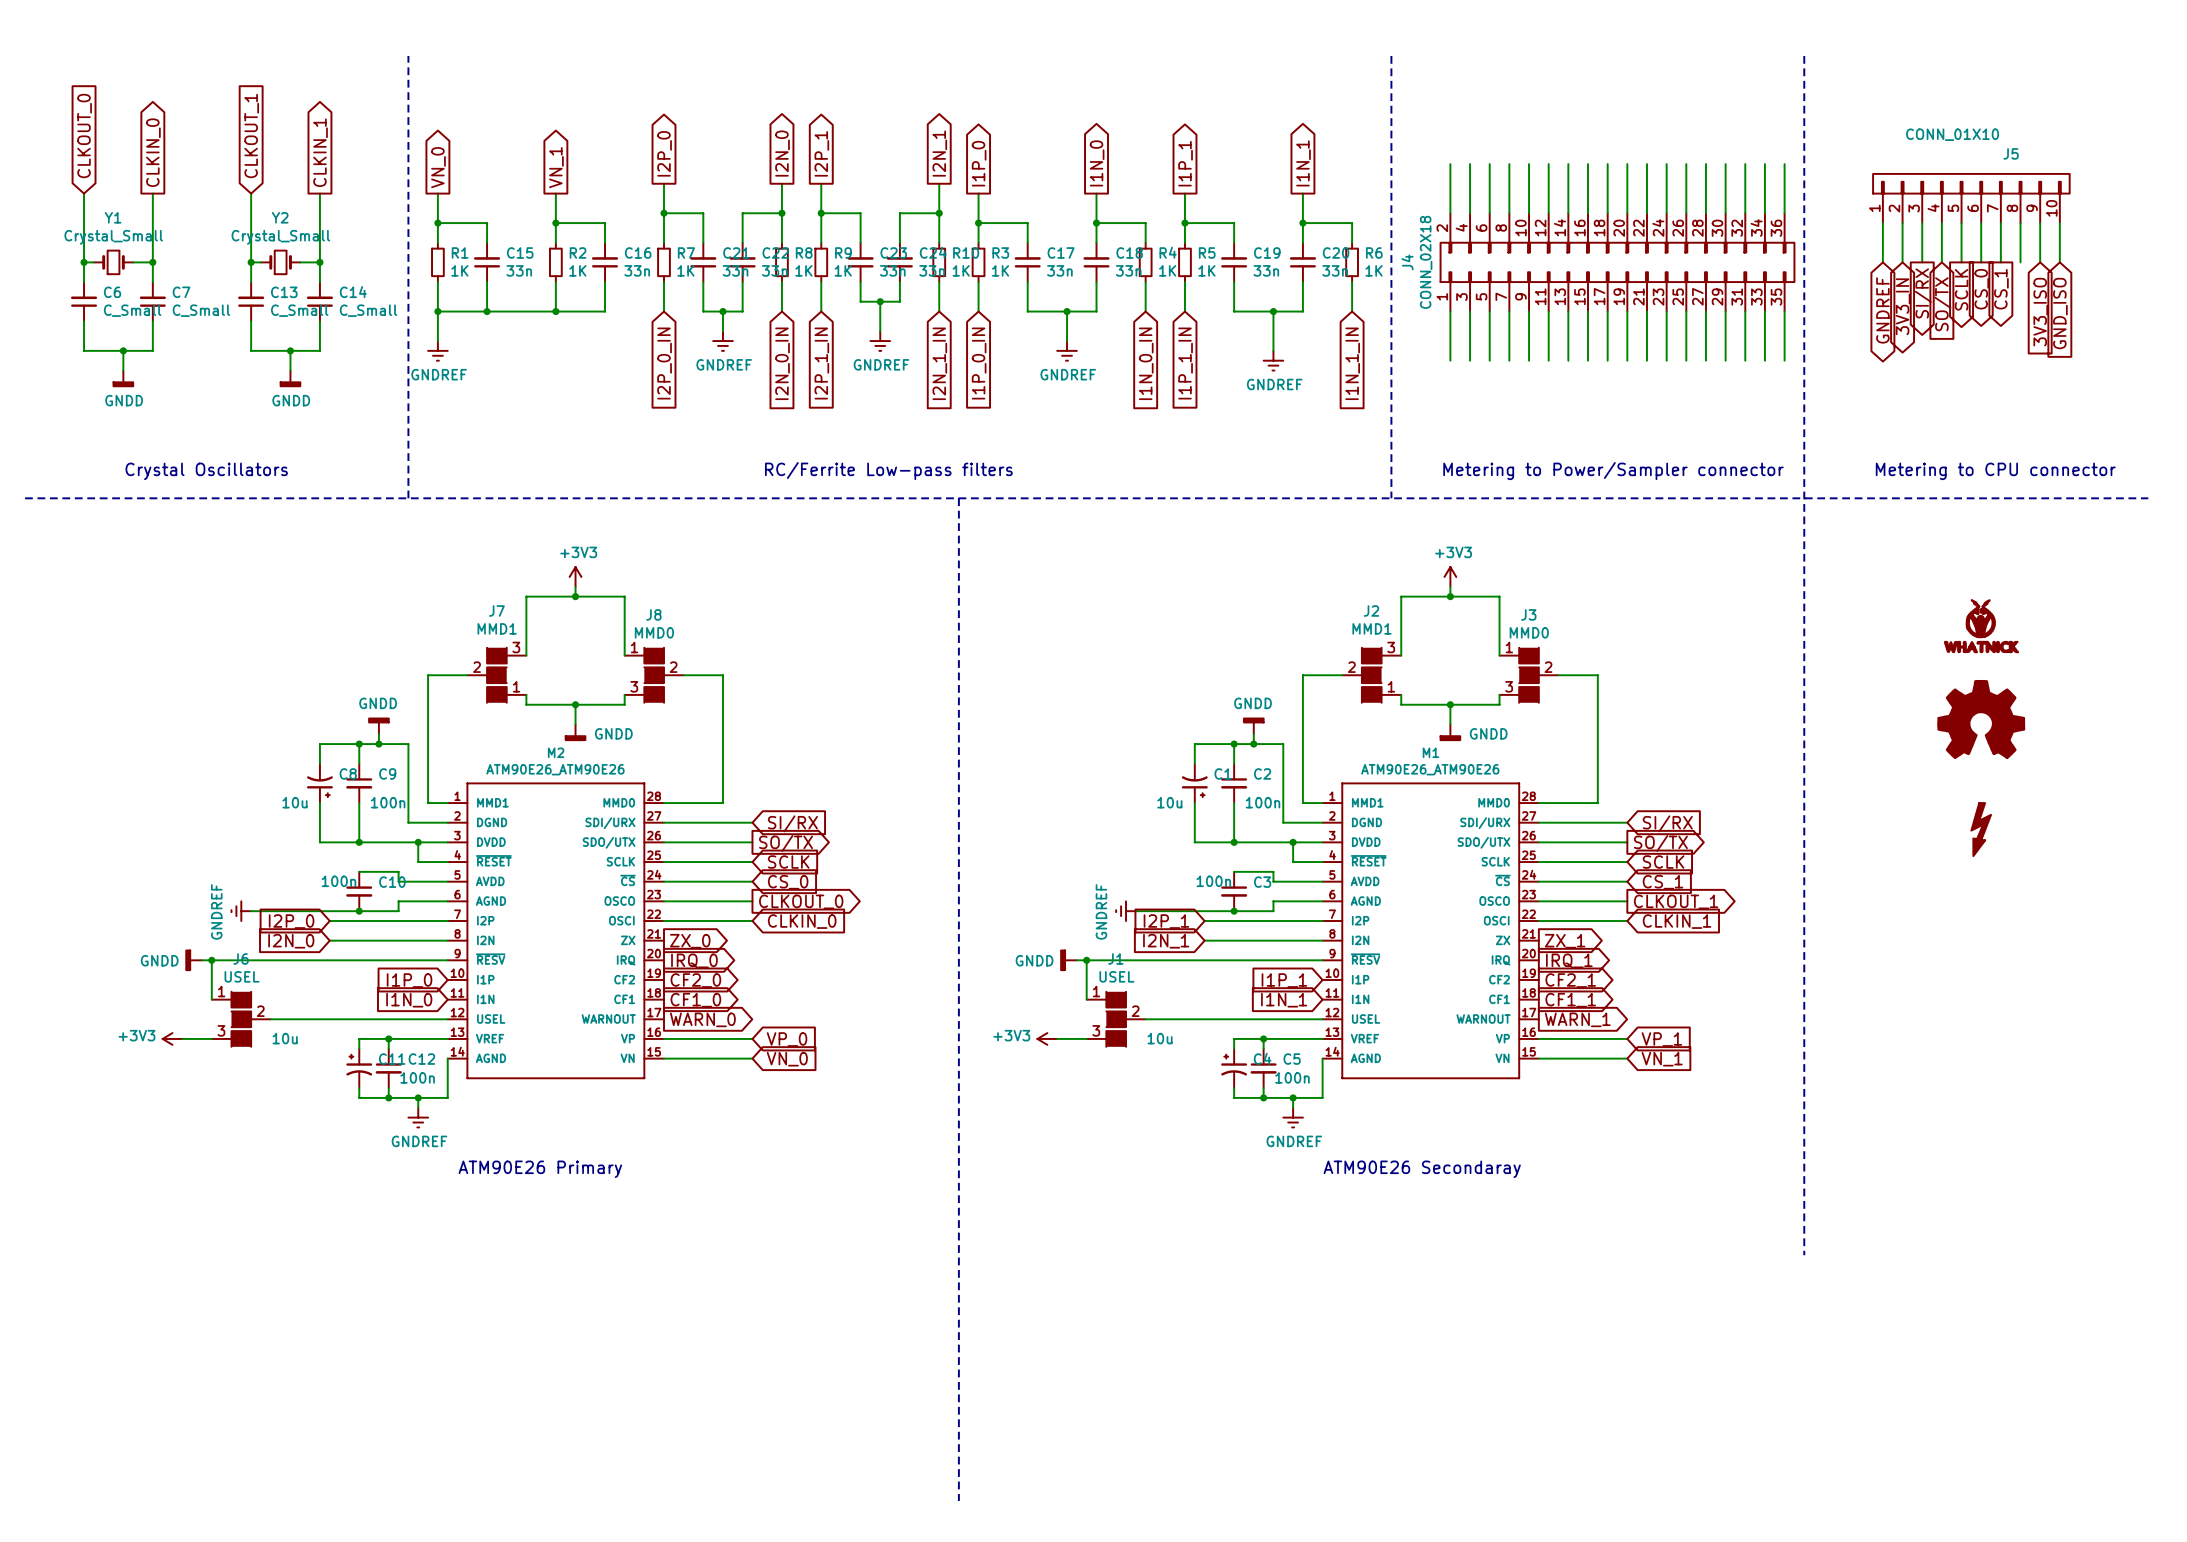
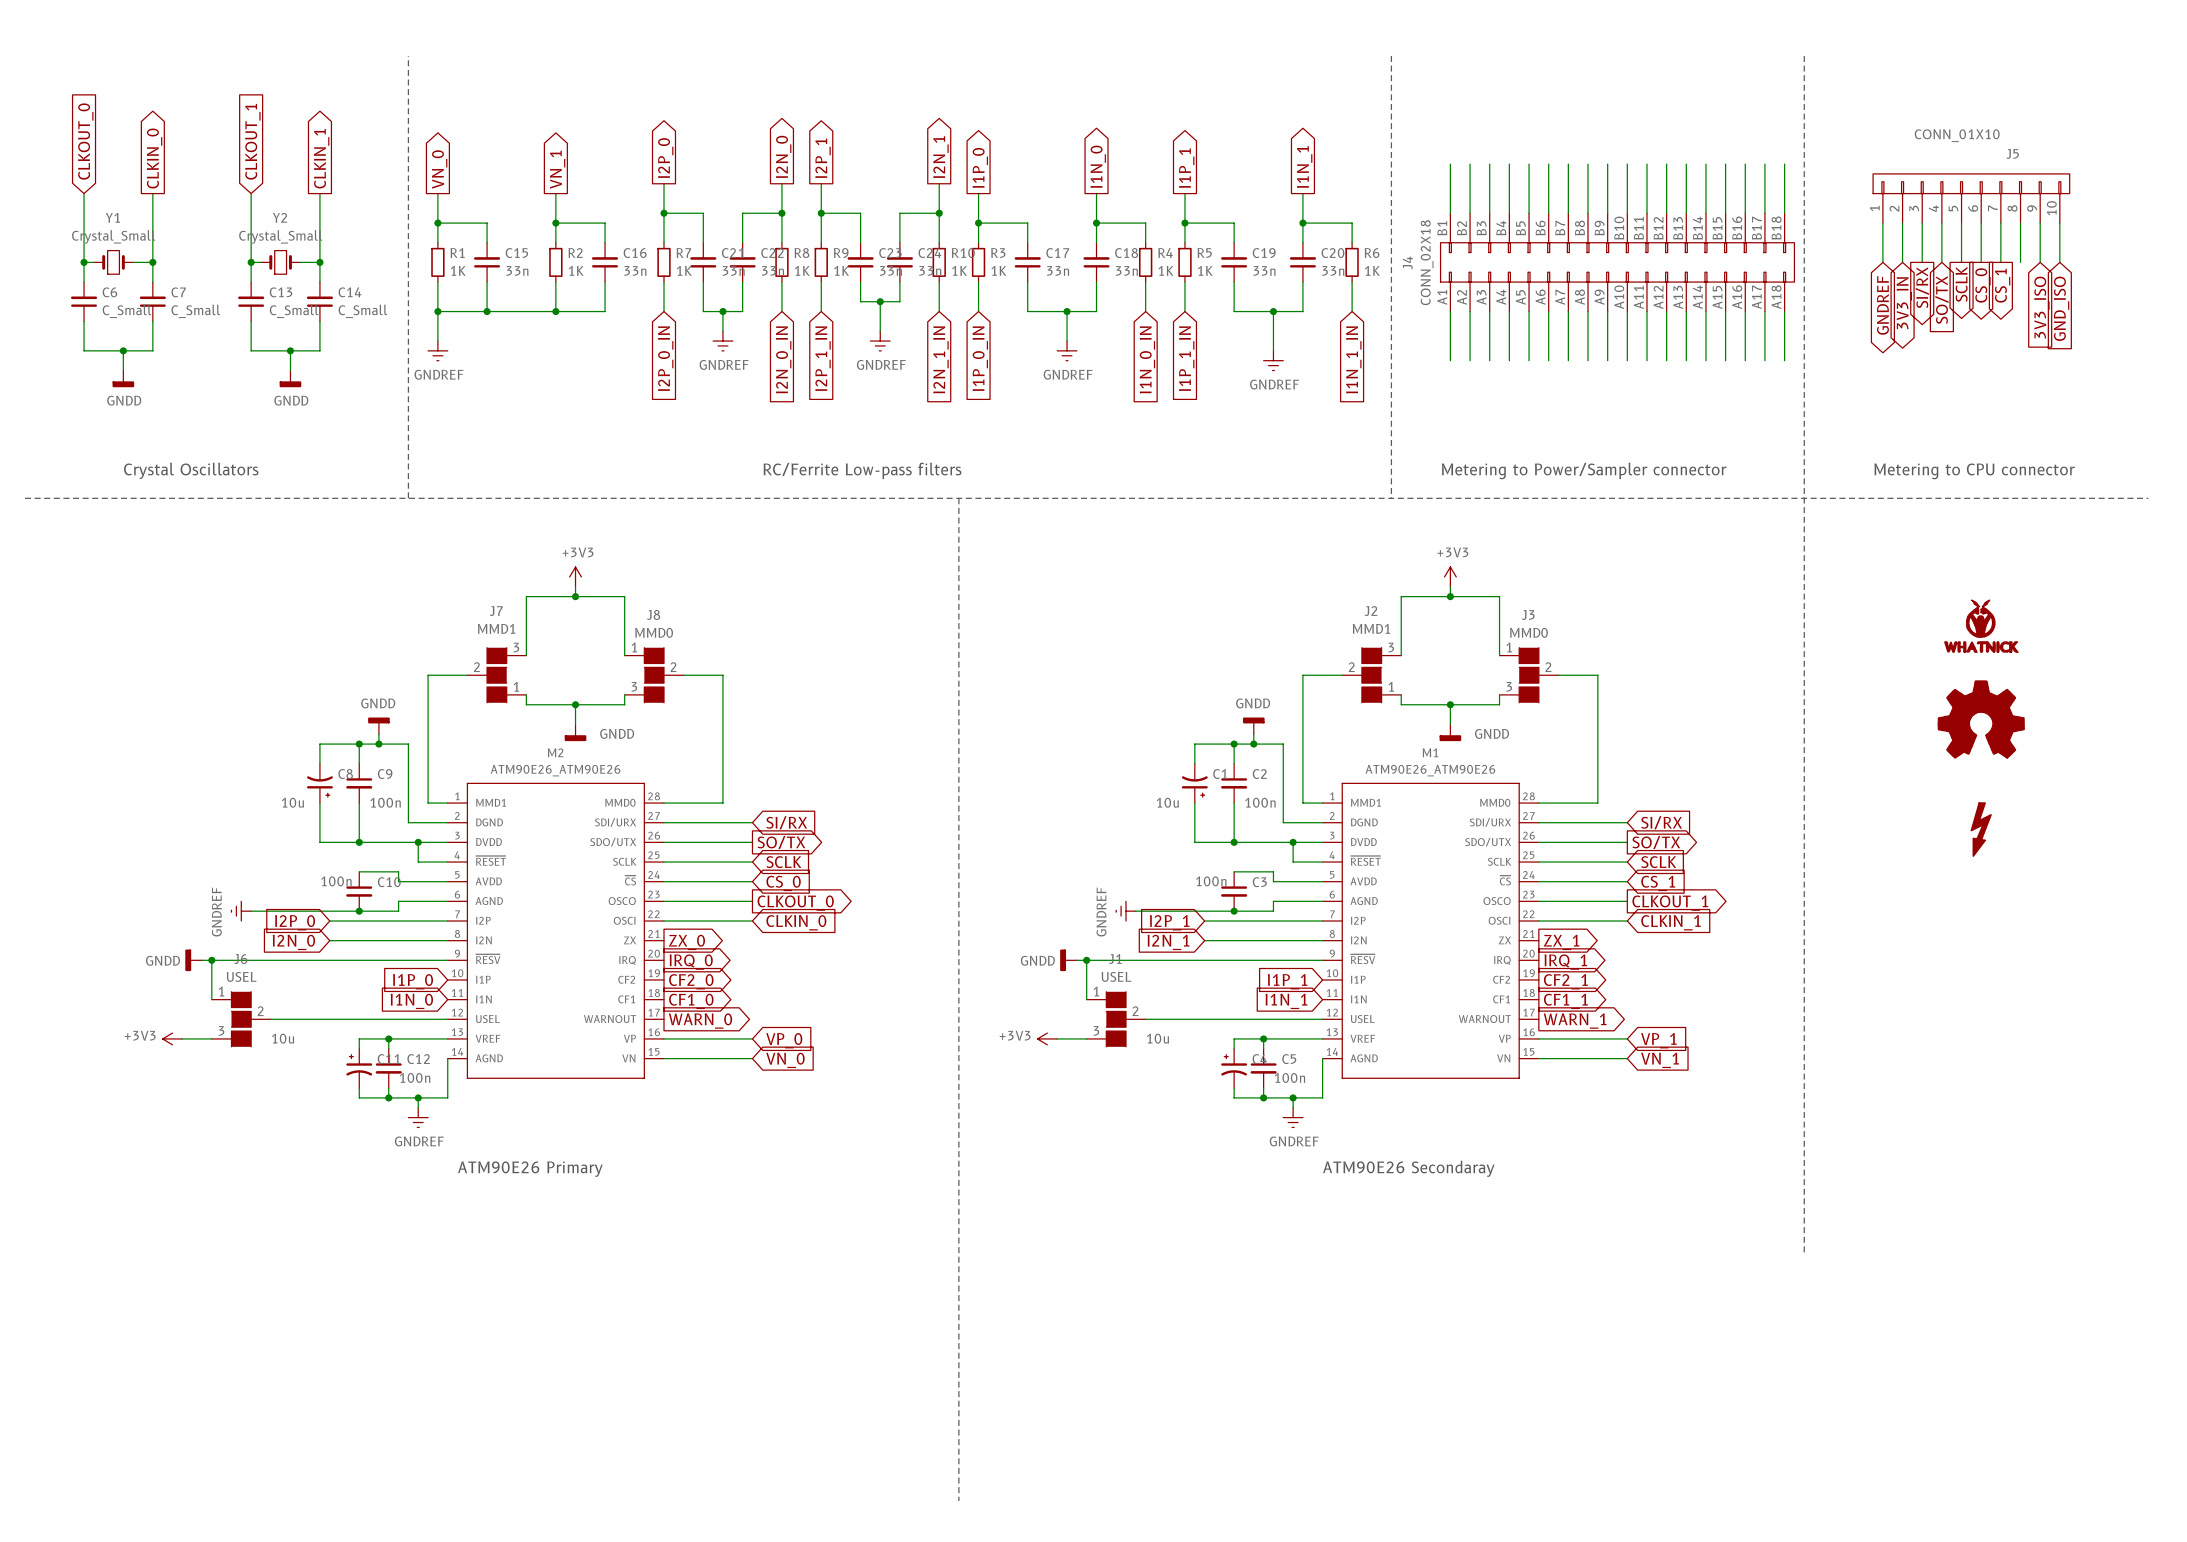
J4 symbol: [1440, 213, 1795, 312] -> [1440, 213, 1795, 312]

